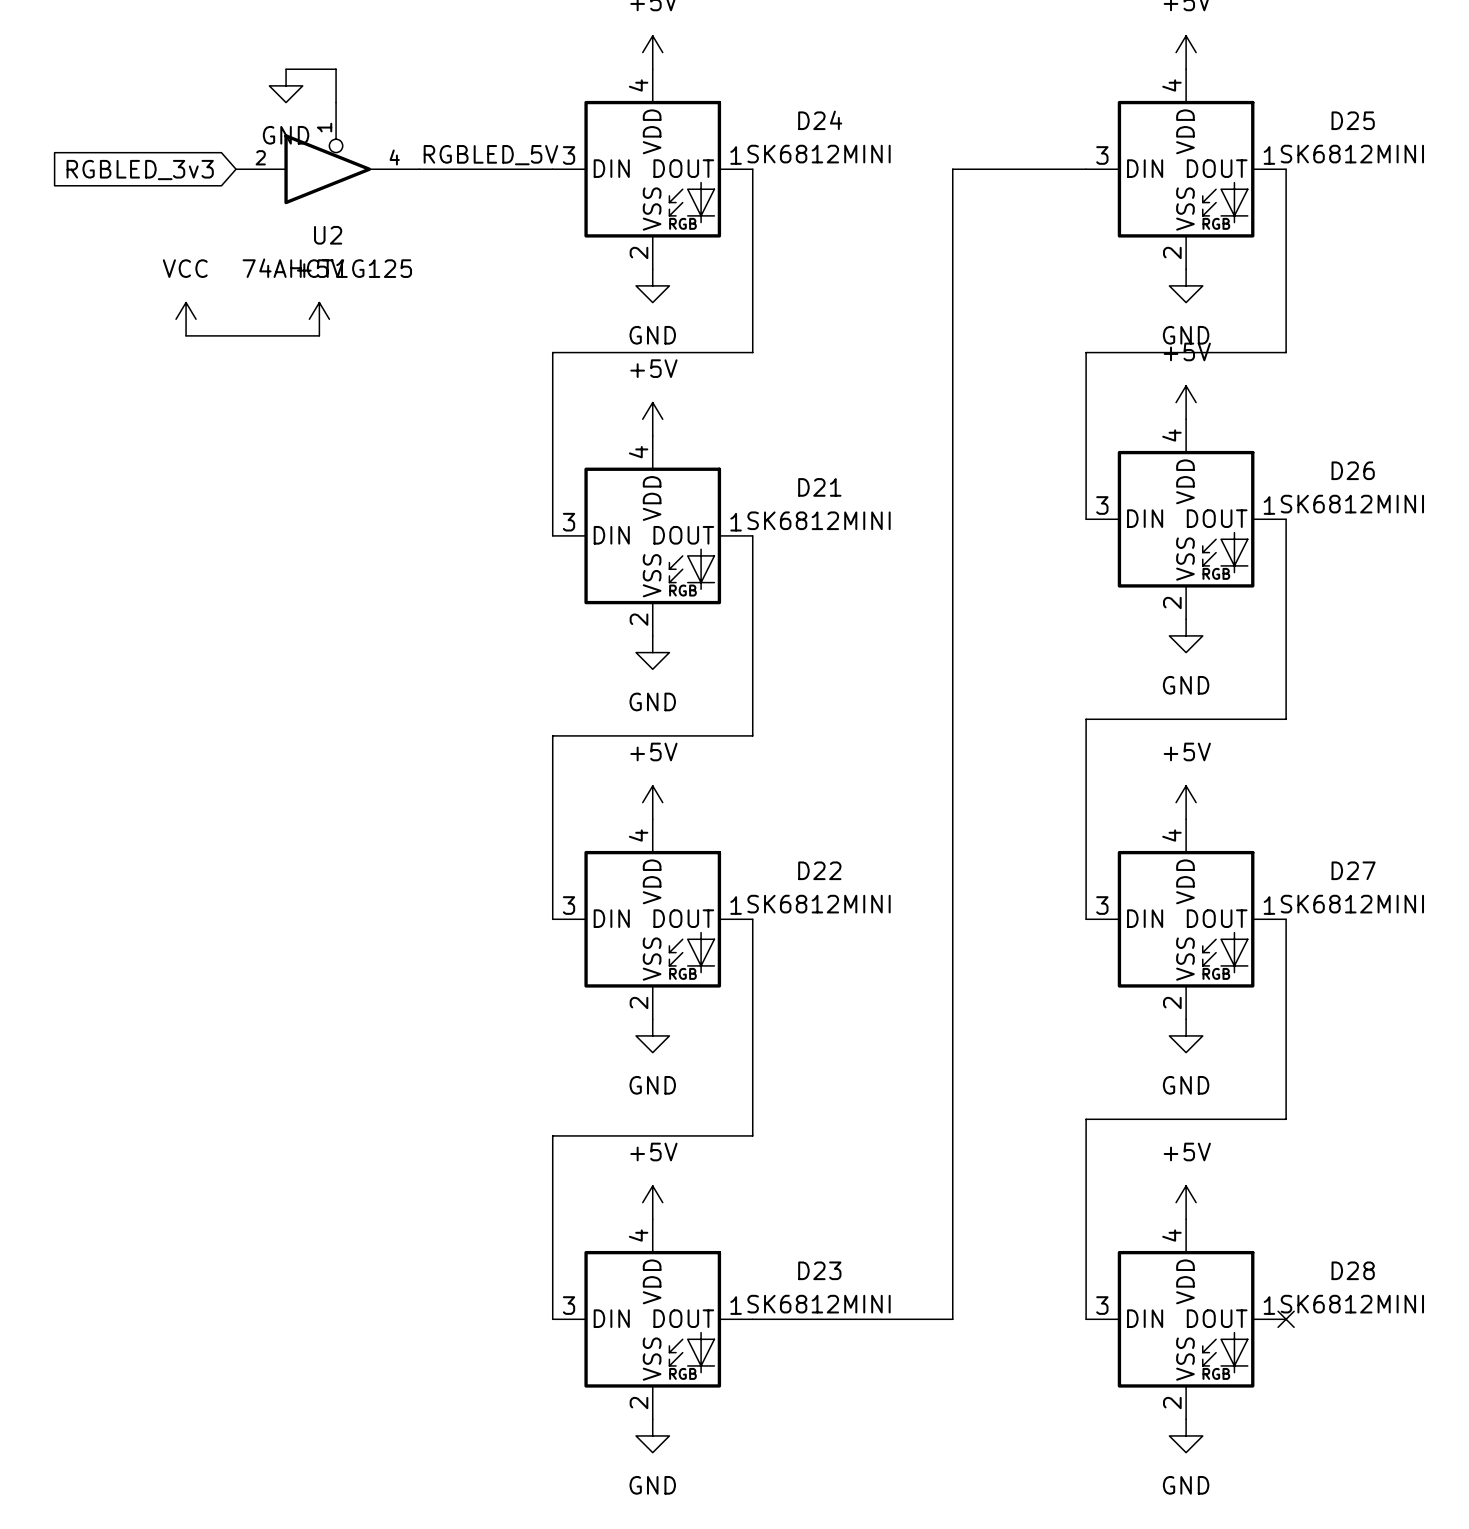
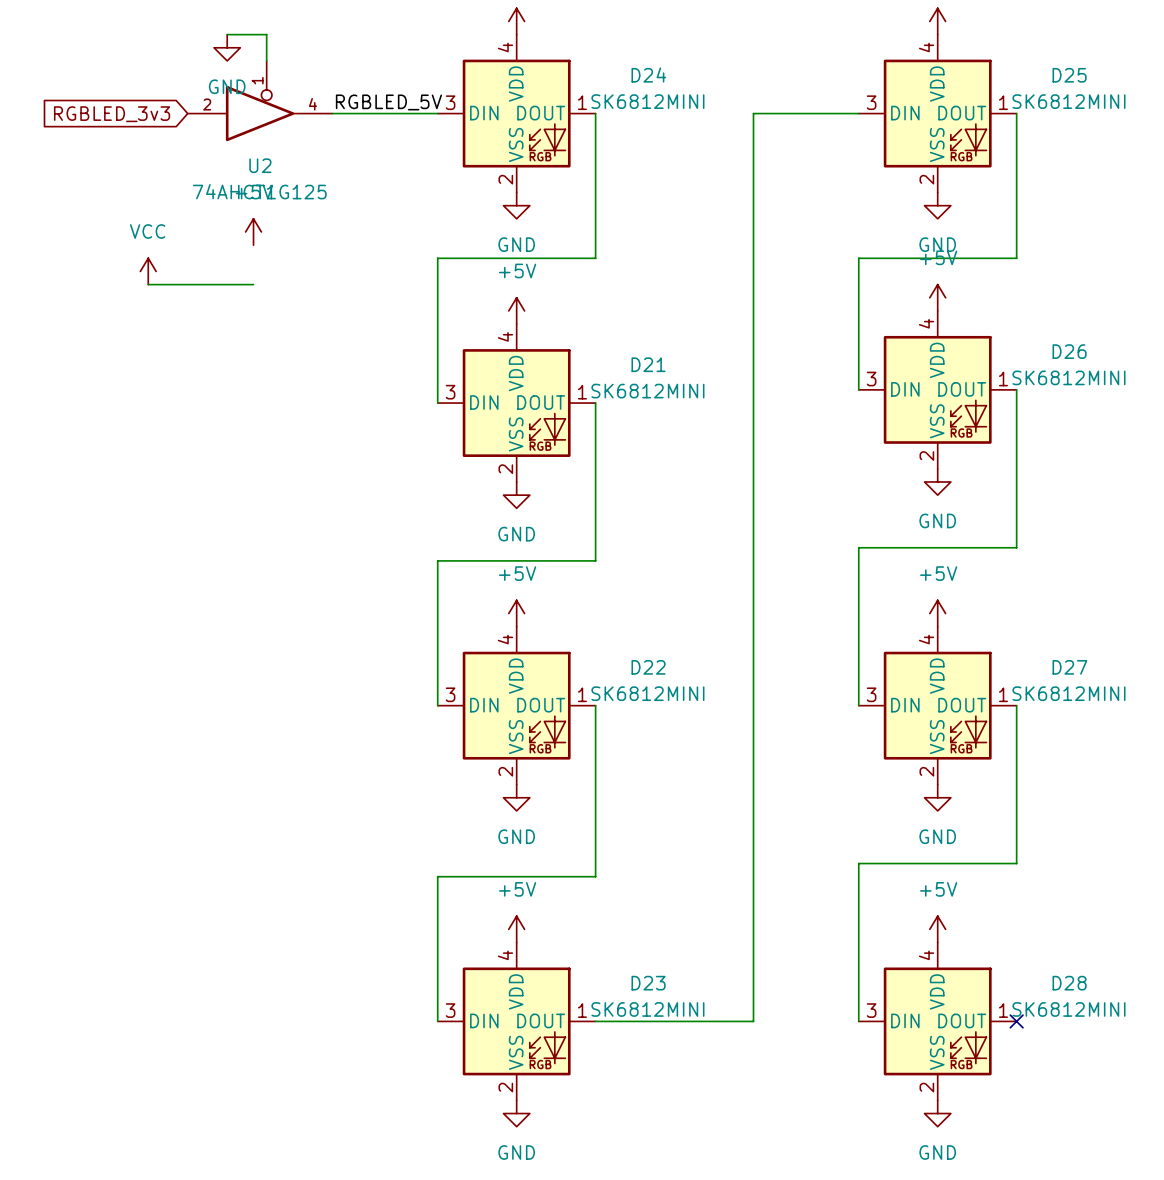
power symbol position: VCC (186, 319) -> VCC (148, 271)
wire: (186, 335) (319, 335) -> (148, 284) (253, 284)

